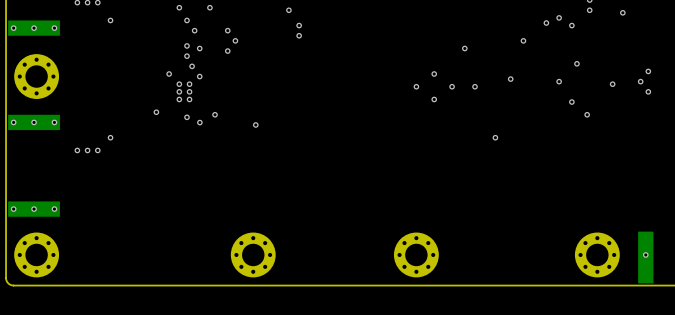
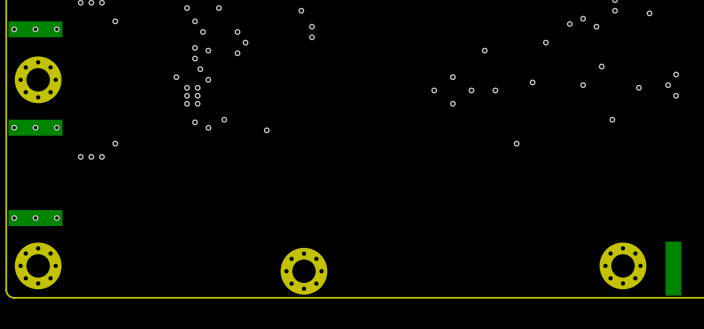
via: (571, 102) -> none
via: (156, 112) -> none
part position: (253, 254) -> (303, 271)
part: (416, 254) -> none
via: (645, 254) -> none

